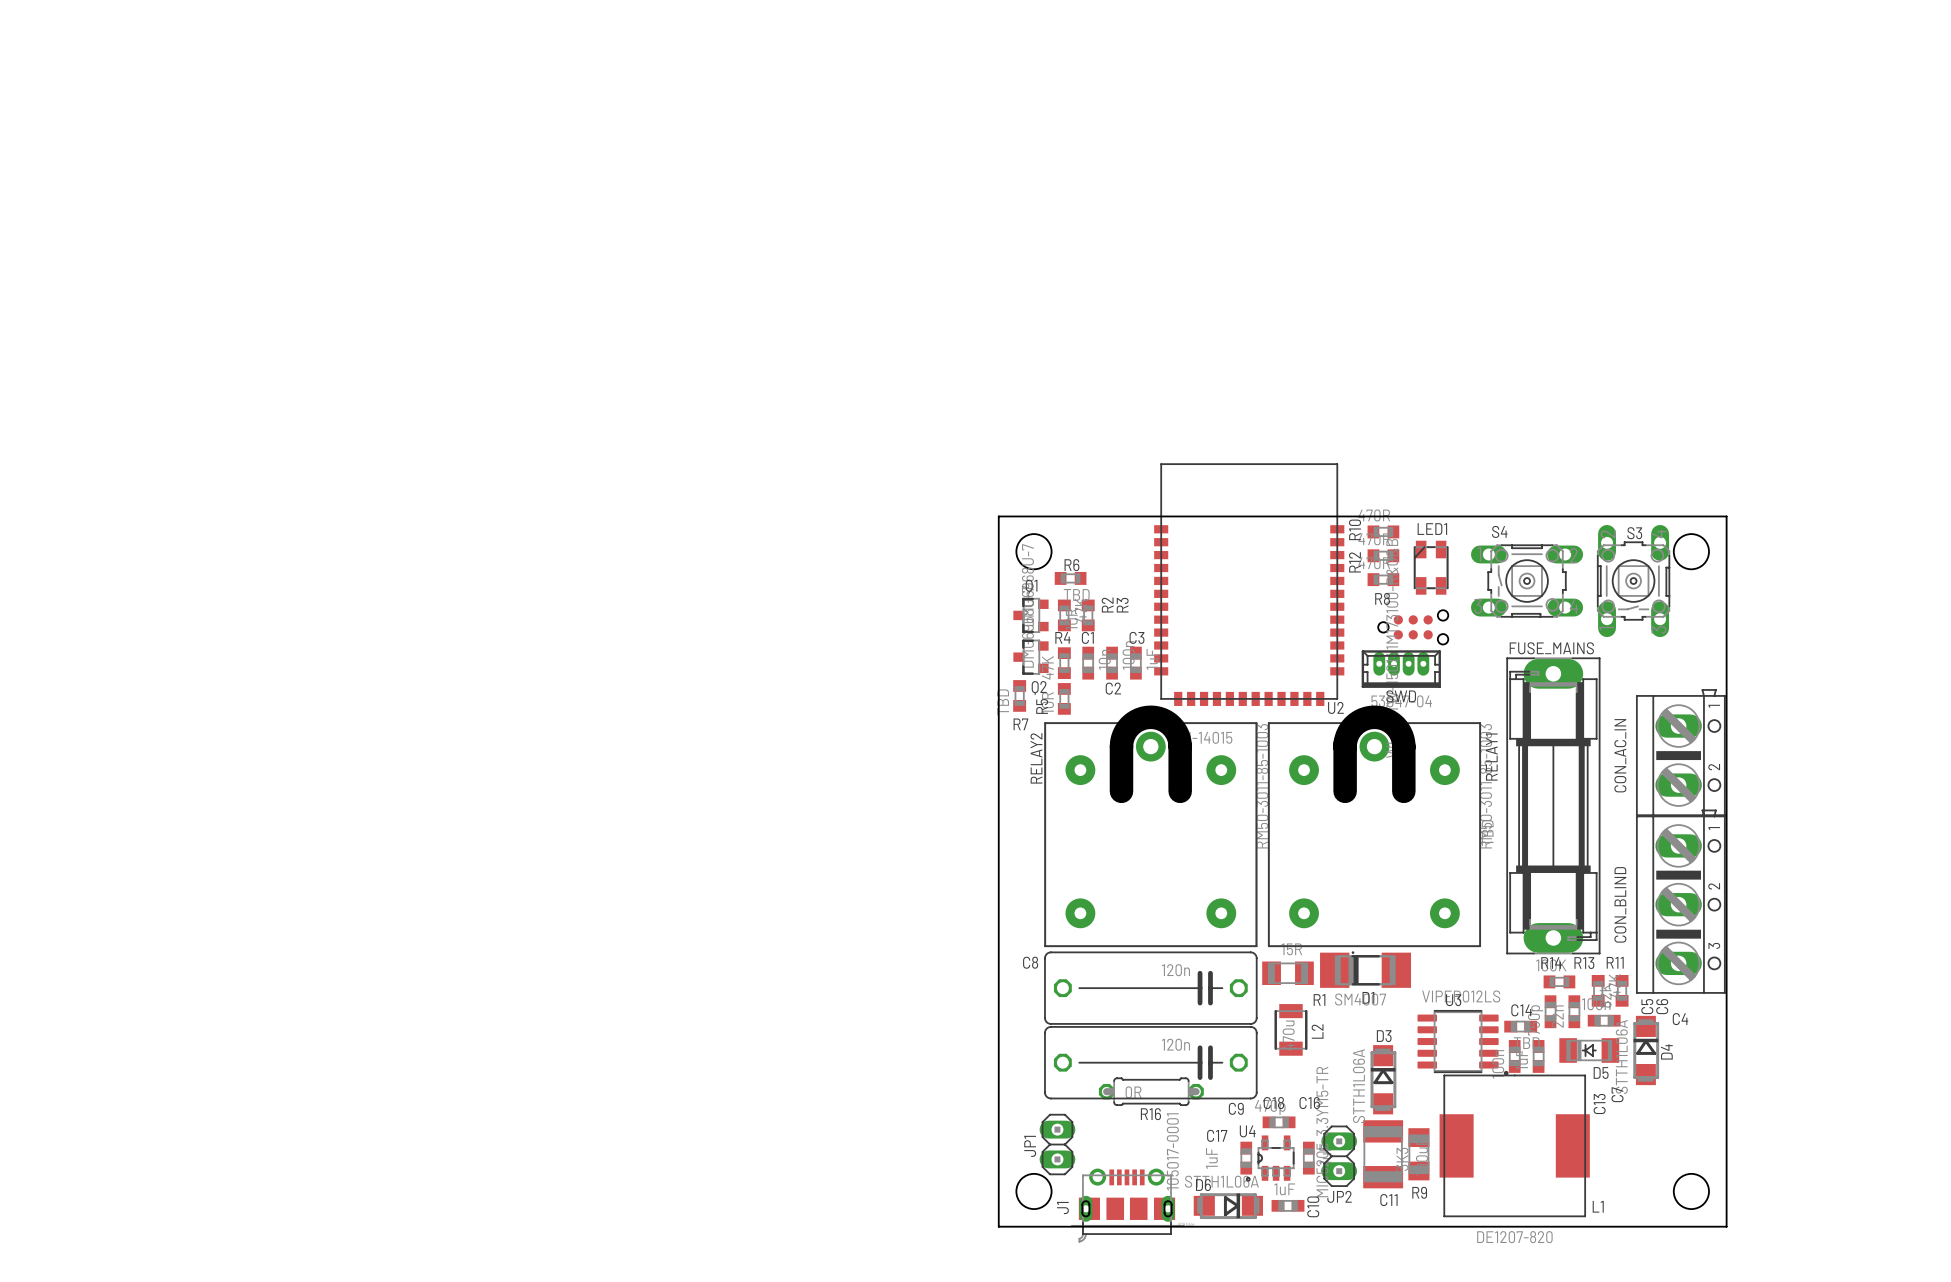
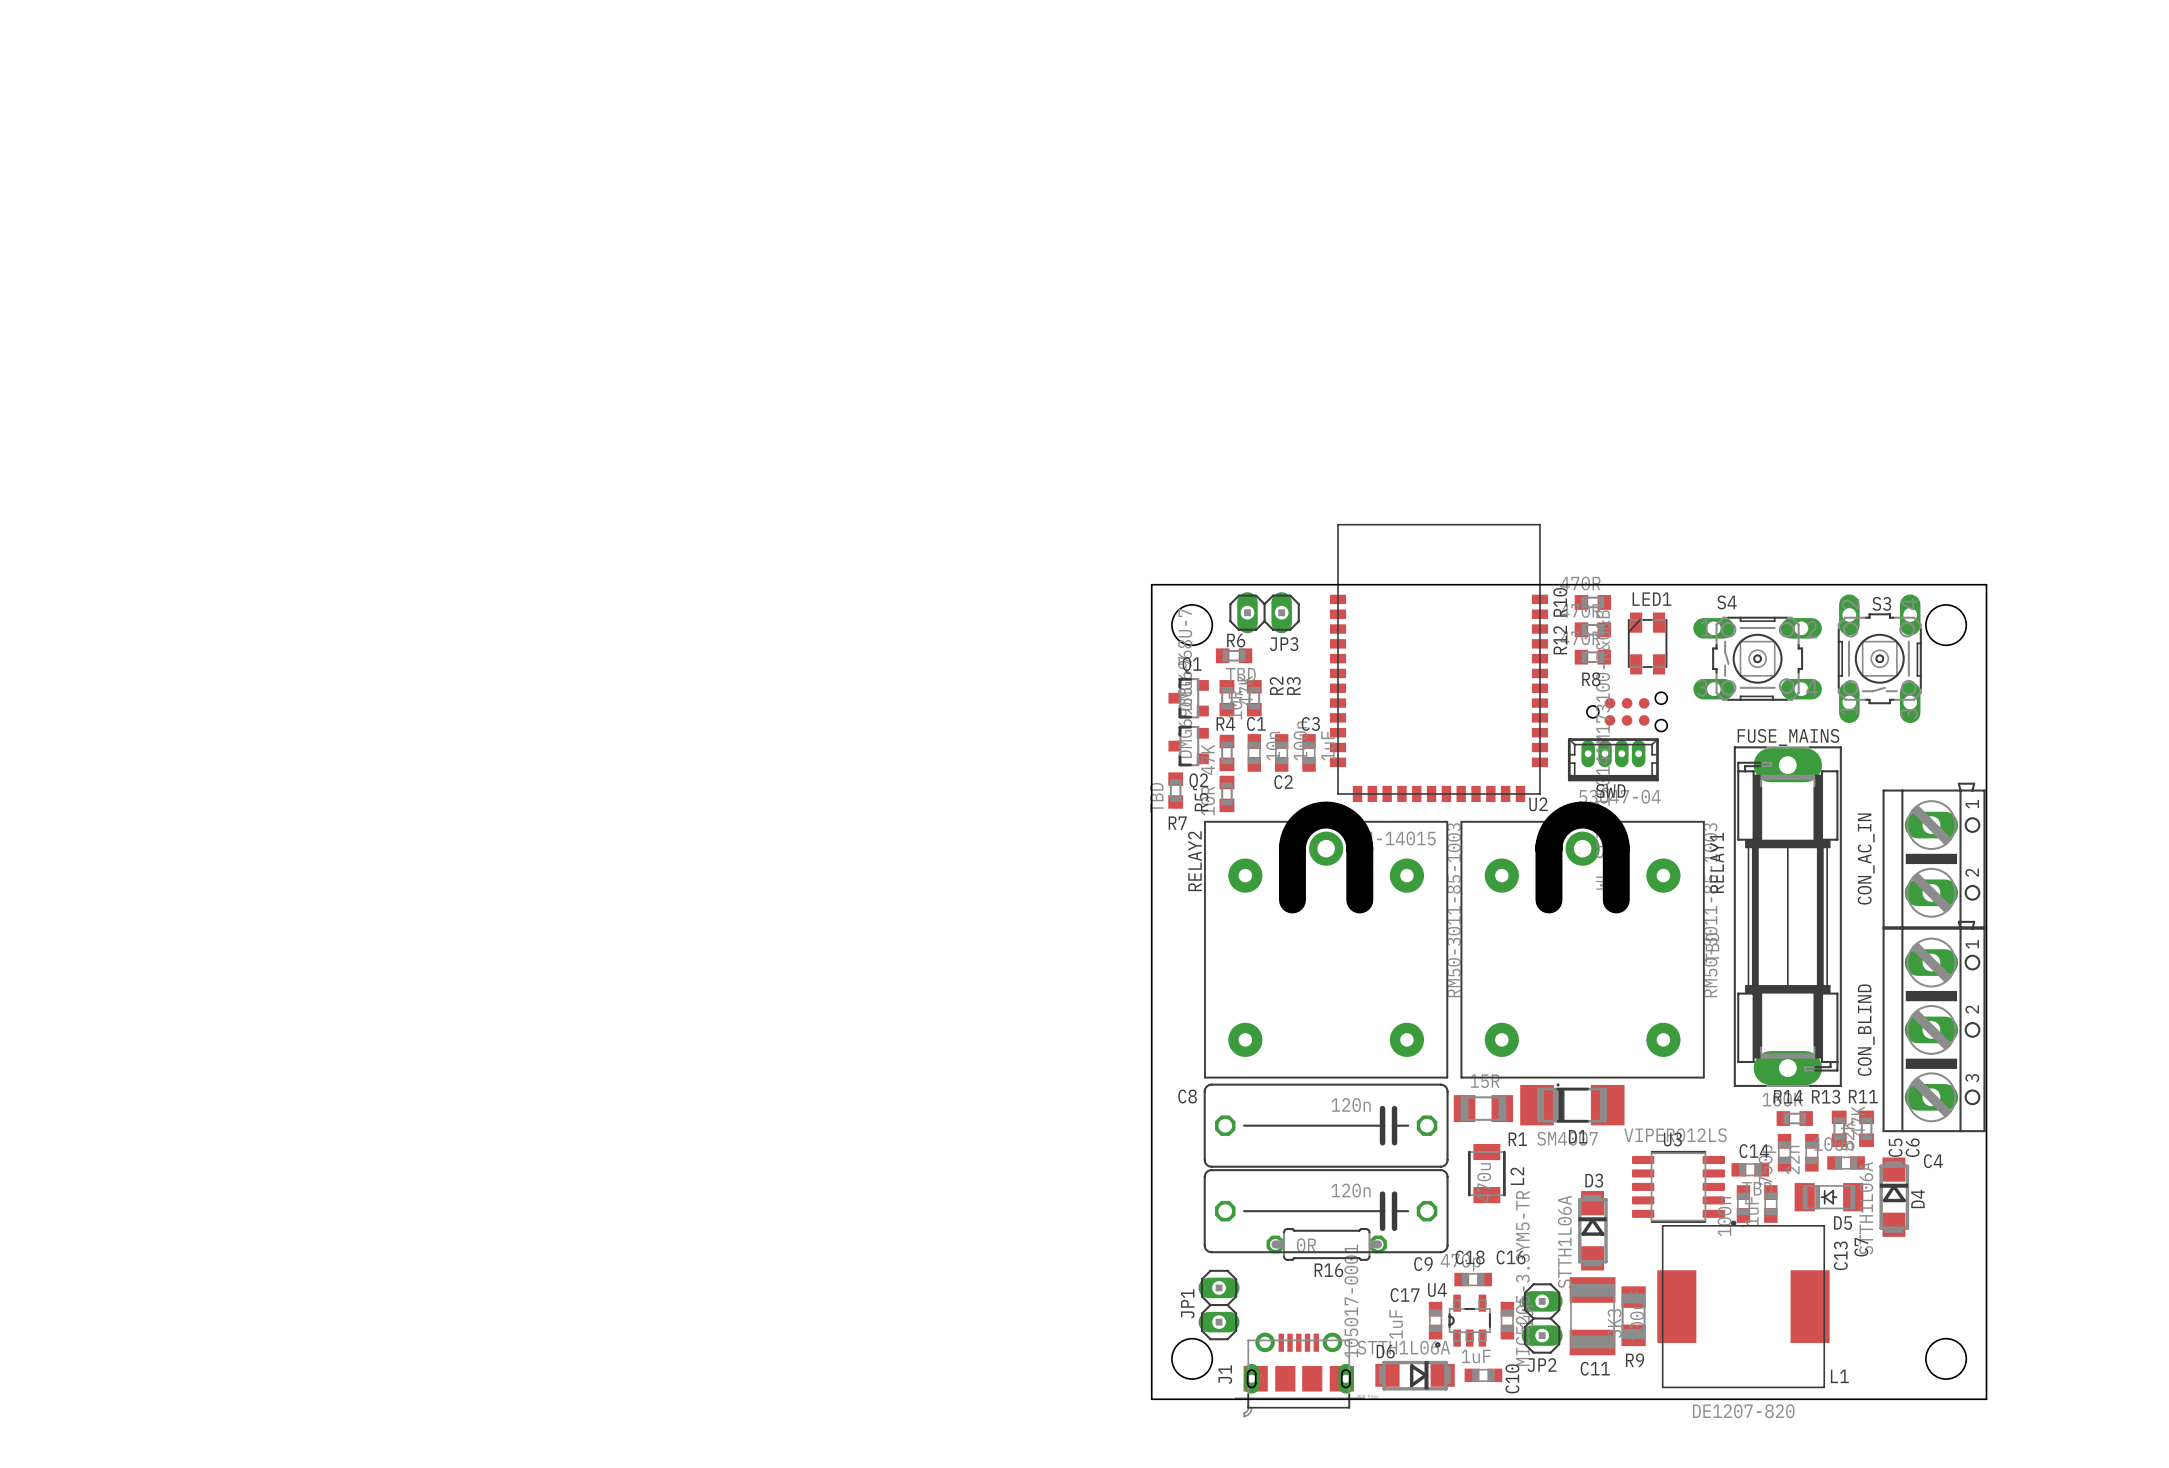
JP3: none -> (1264, 612)

